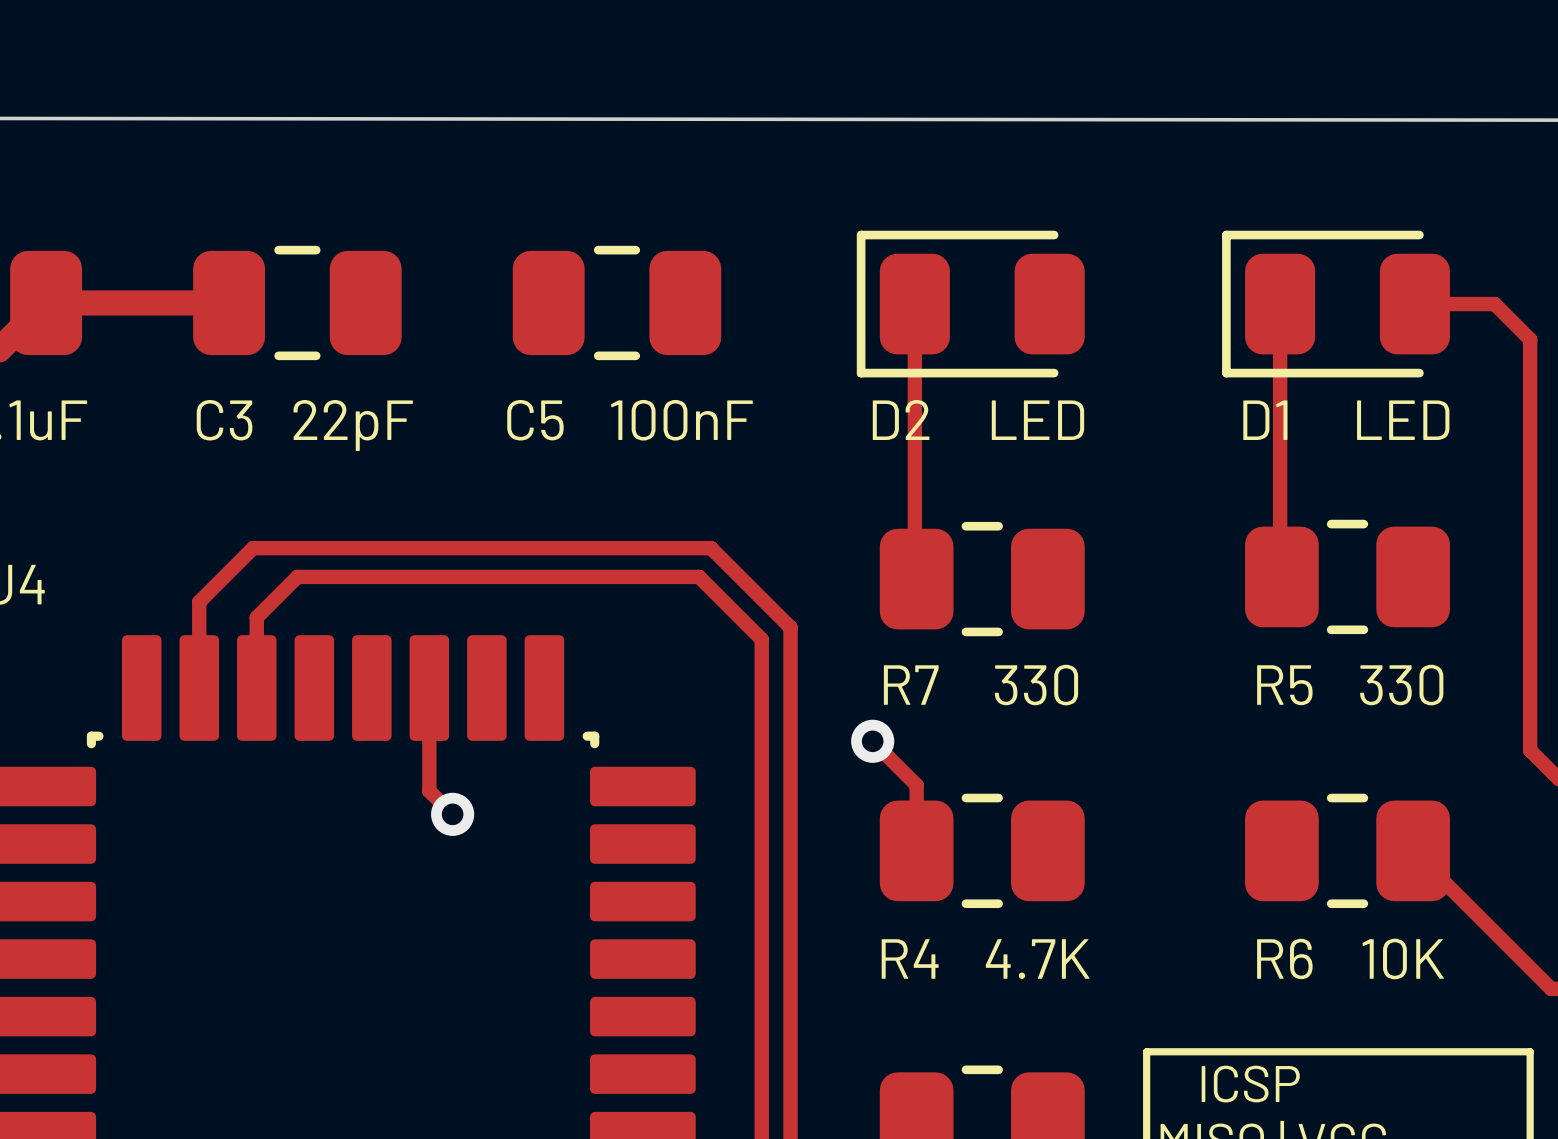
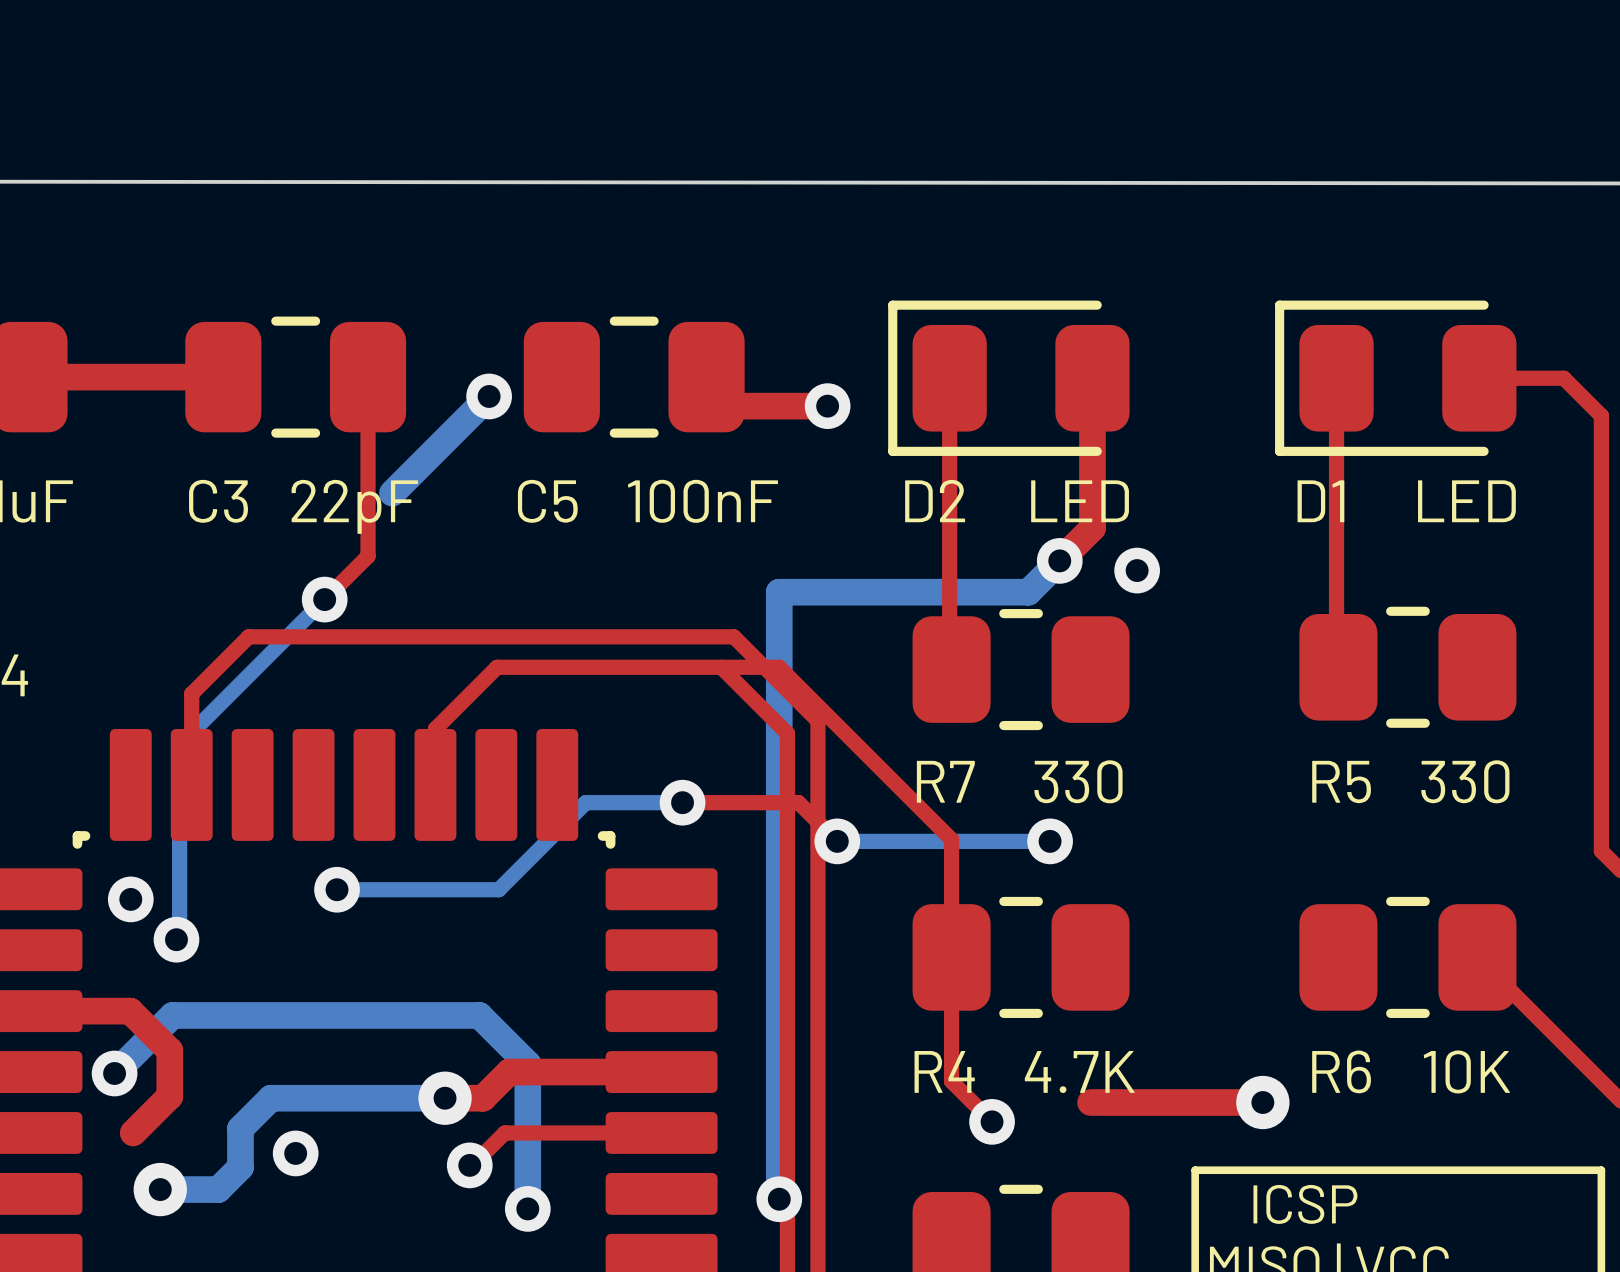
top track: none -> (368, 377) (368, 556) (324, 599)
top track: none -> (706, 377) (735, 406) (827, 406)
top track: none -> (1092, 378) (1092, 528) (1059, 560)
bottom track: none -> (489, 396) (392, 493)
via: none -> (489, 396)
via: none -> (827, 406)
bottom track: none -> (1059, 560) (1028, 592) (779, 592) (779, 1199)
via: none -> (1059, 560)
via: none -> (1137, 570)
bottom track: none -> (324, 599) (179, 744) (179, 936) (176, 939)
via: none -> (324, 599)
top track: (487, 576) (297, 576) (256, 617) (256, 688) -> (497, 667) (435, 728) (435, 784)
top track: (429, 688) (429, 791) (452, 814) -> none
top track: none -> (682, 802) (798, 802) (837, 841)
bottom track: none -> (682, 802) (585, 802) (498, 889) (337, 889)
via: none -> (682, 802)
bottom track: none -> (837, 841) (1050, 841)
top track: (872, 741) (916, 785) -> (721, 667) (779, 667) (951, 839) (951, 887)
via position: (872, 741) -> (837, 841)
via: none -> (1050, 841)
via: none -> (337, 889)
via: none -> (130, 899)
via: (452, 814) -> none
via: none -> (176, 939)
top track: none -> (951, 957) (951, 1081) (992, 1121)
top track: none -> (26, 1011) (130, 1011) (169, 1050) (169, 1096) (133, 1132)
top track: none -> (661, 1072) (509, 1072) (483, 1098) (445, 1098)
bottom track: none -> (114, 1073) (172, 1015) (479, 1015) (527, 1063) (527, 1208)
via: none -> (114, 1073)
bottom track: none -> (445, 1098) (270, 1098) (240, 1128) (240, 1167) (218, 1189) (160, 1189)
via: none -> (445, 1098)
top track: none -> (1090, 1102) (1262, 1102)
via: none -> (1262, 1102)
via: none -> (992, 1121)
top track: none -> (661, 1132) (504, 1132) (472, 1165) (469, 1165)
via: none -> (295, 1153)
via: none -> (469, 1165)
via: none -> (160, 1189)
via: none -> (779, 1199)
via: none -> (527, 1208)

